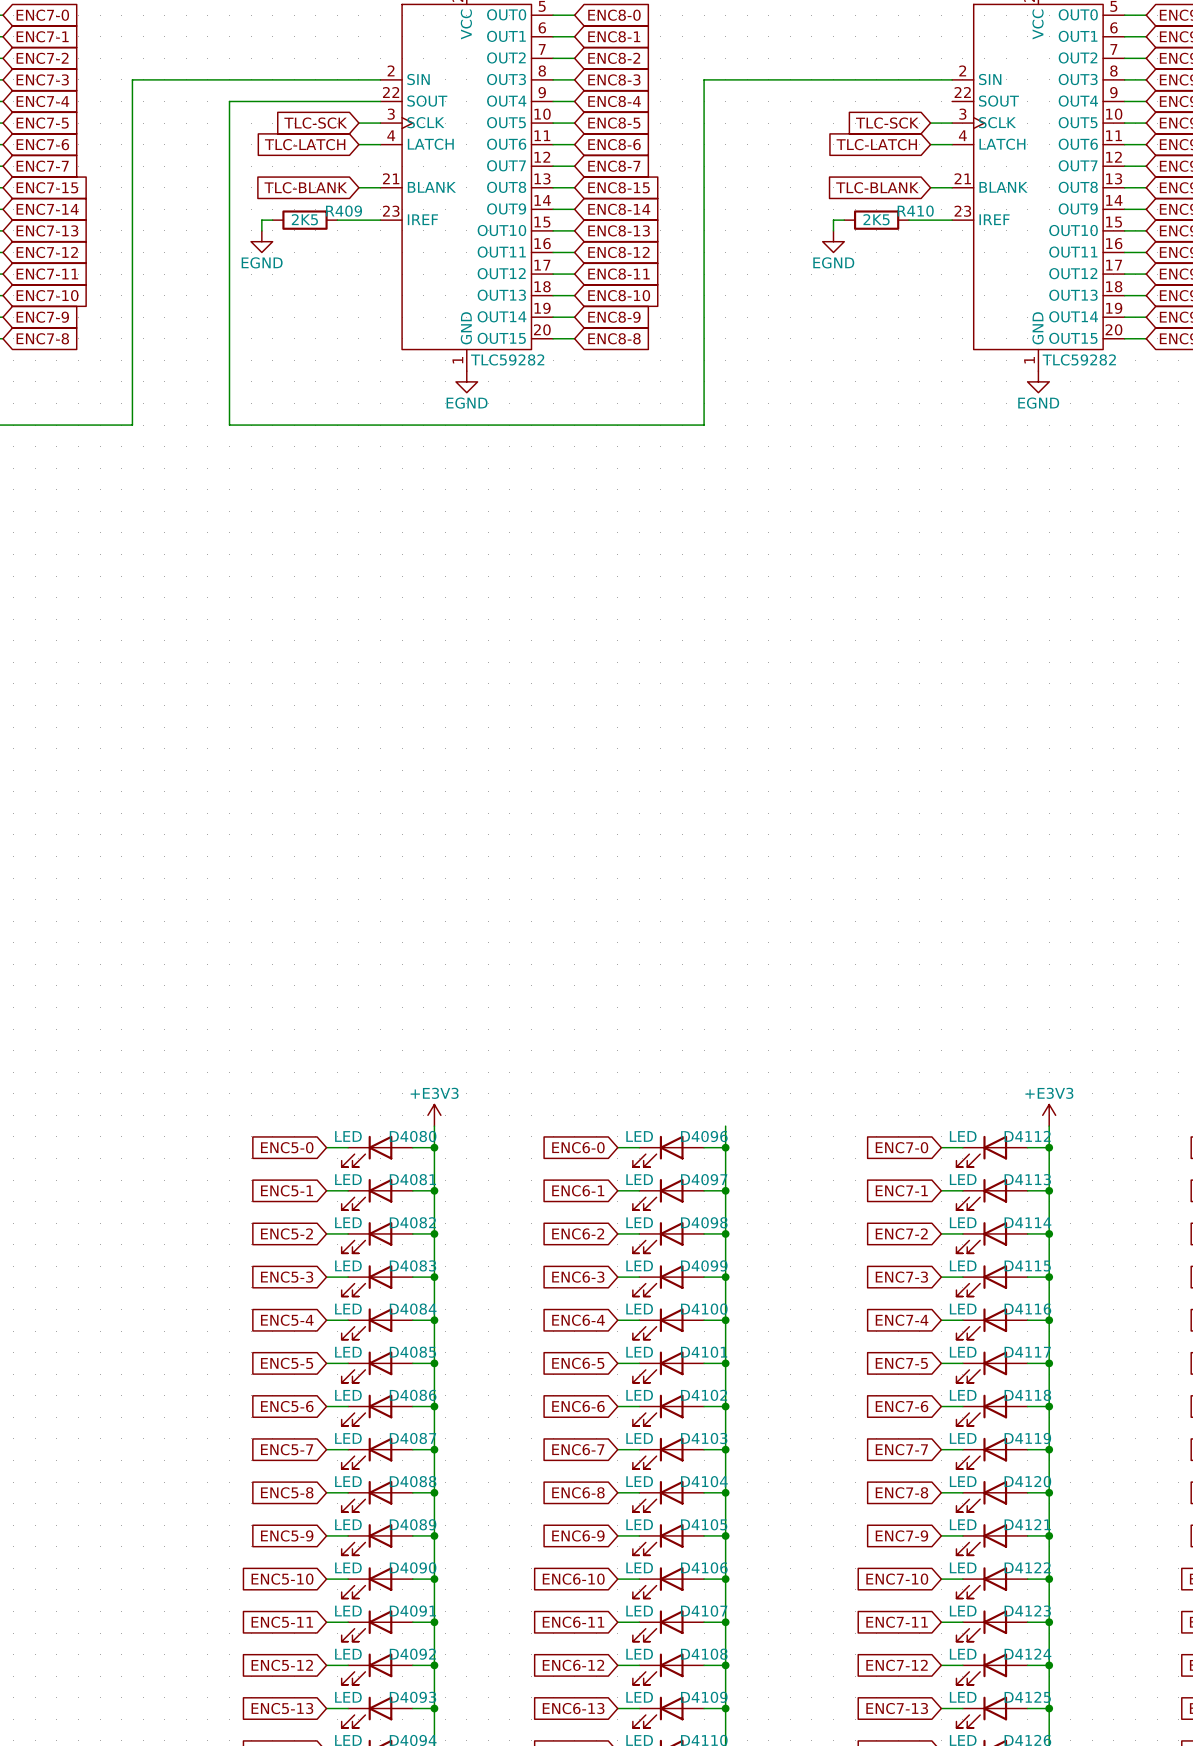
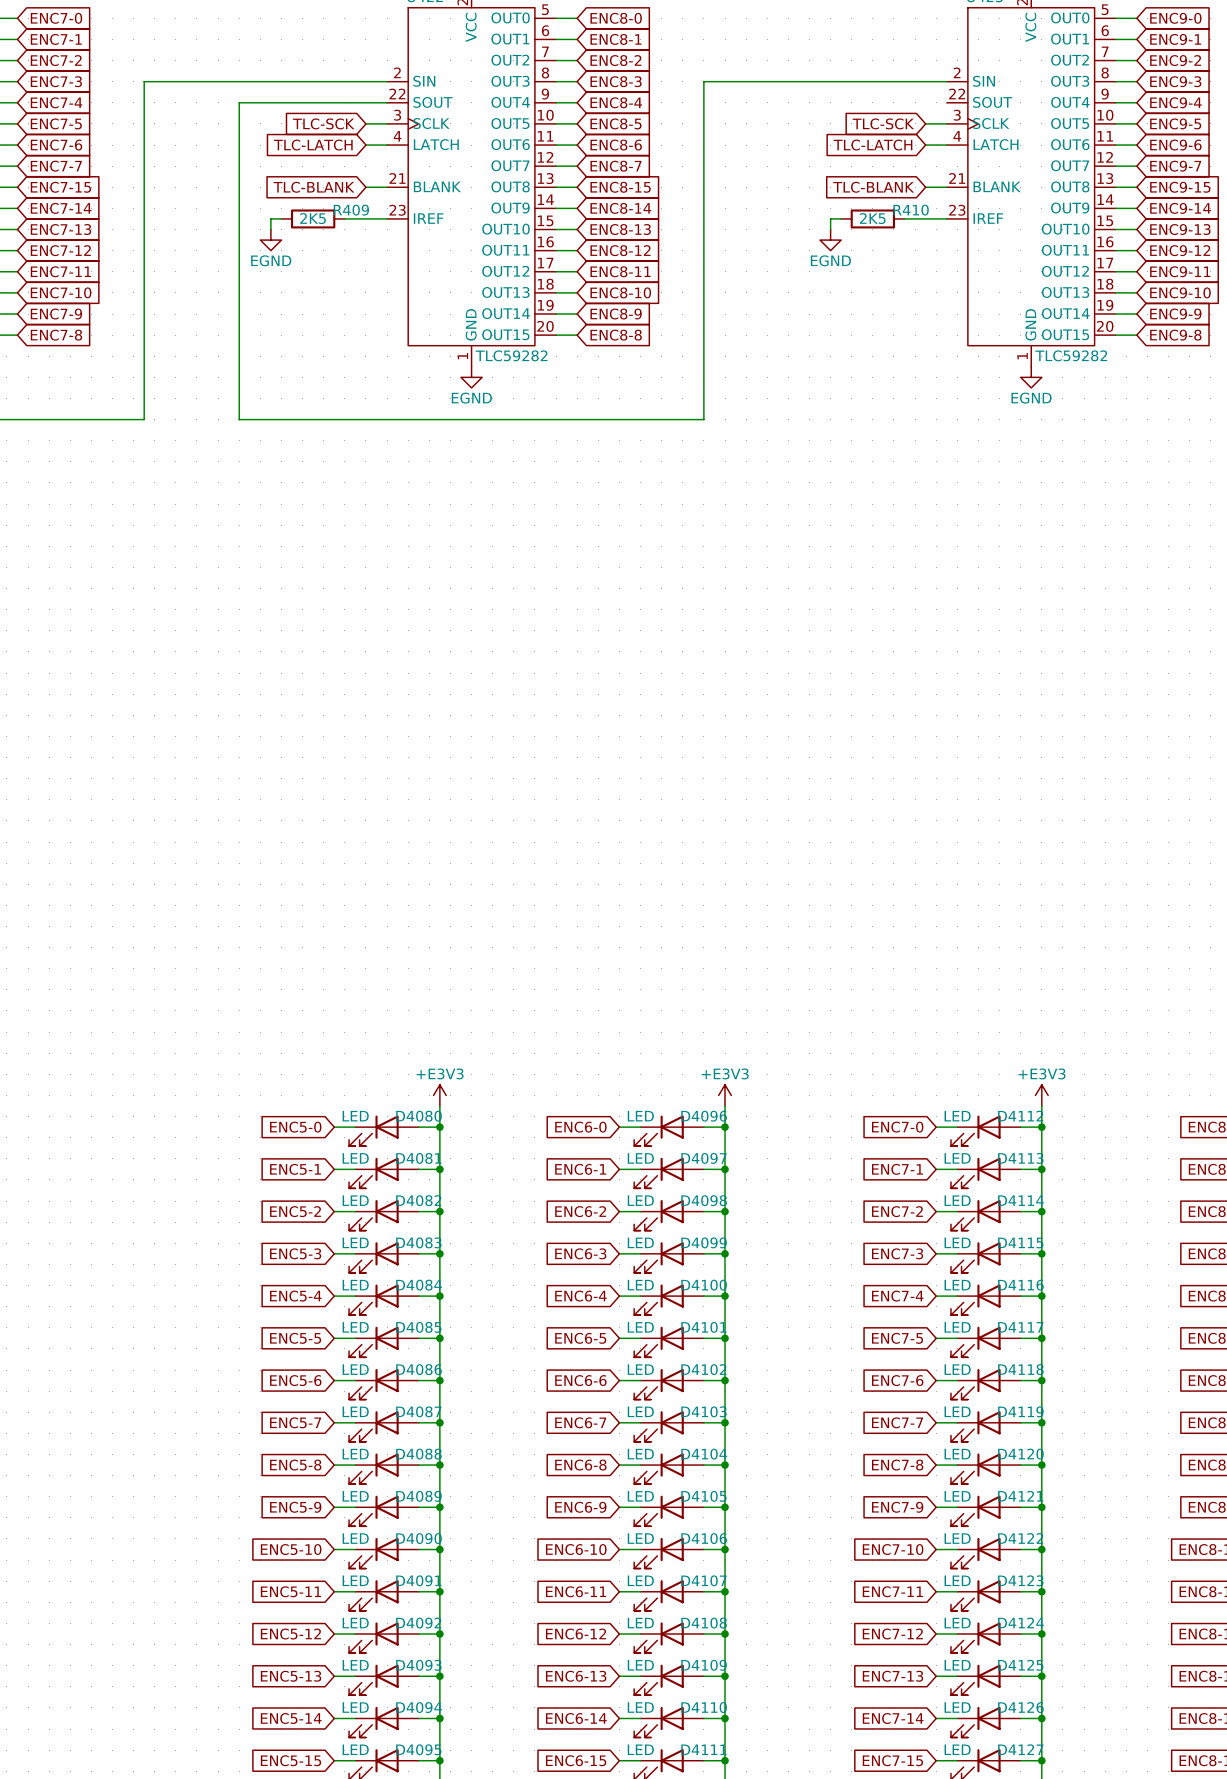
power symbol: none -> +E3V3 (725, 1095)

